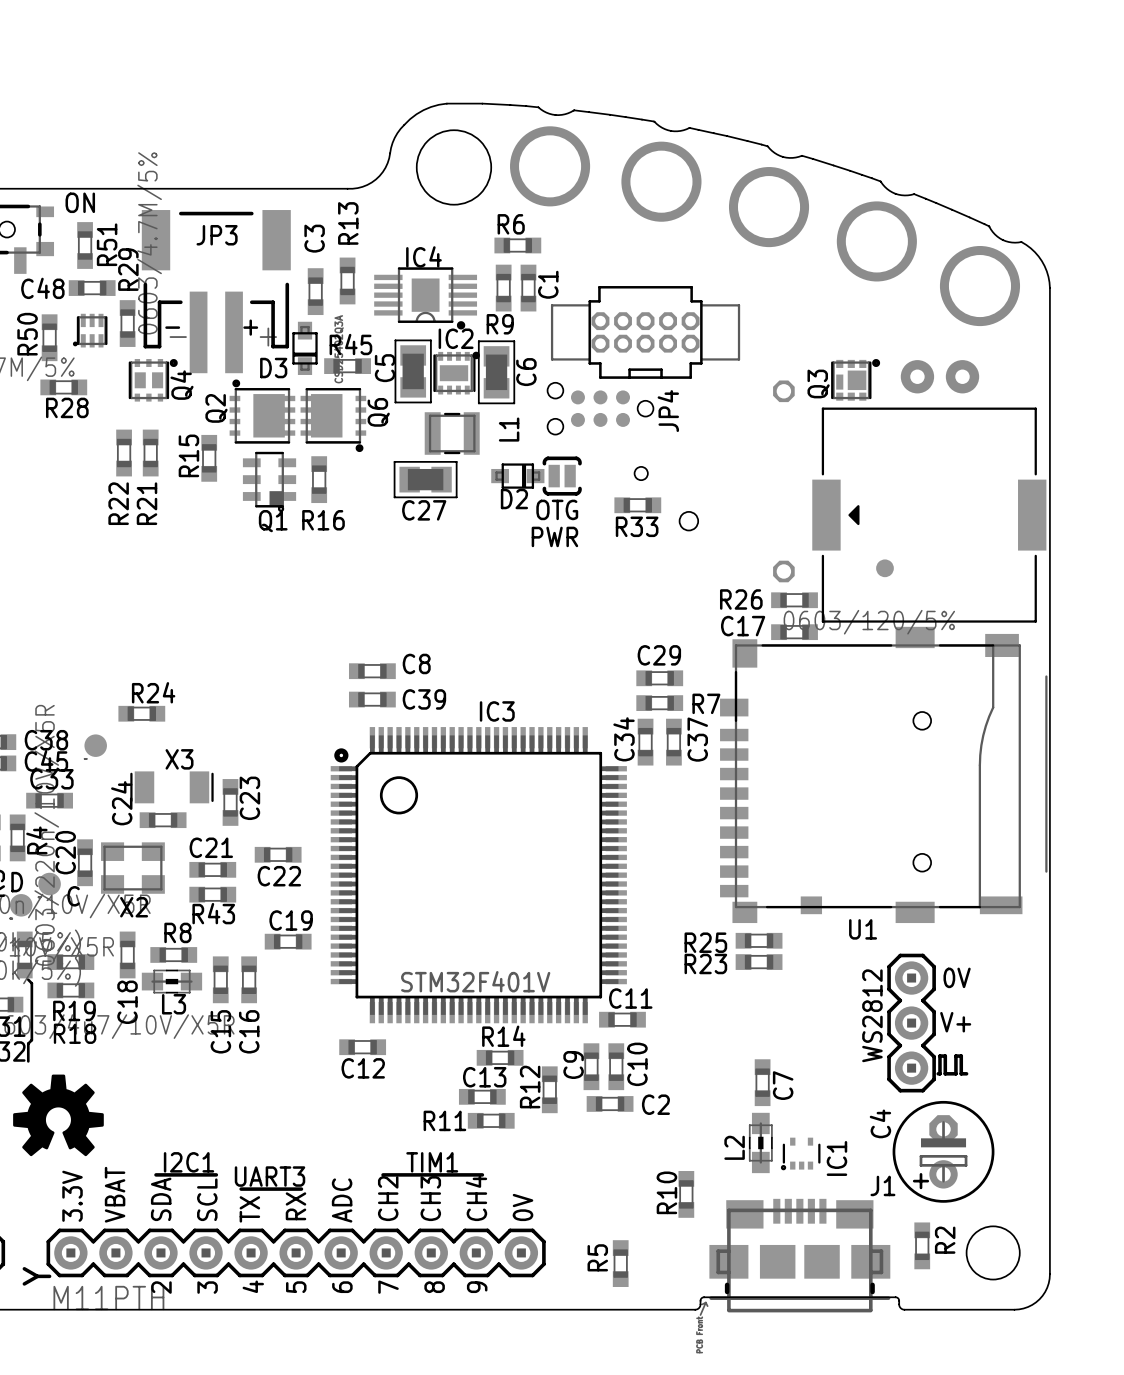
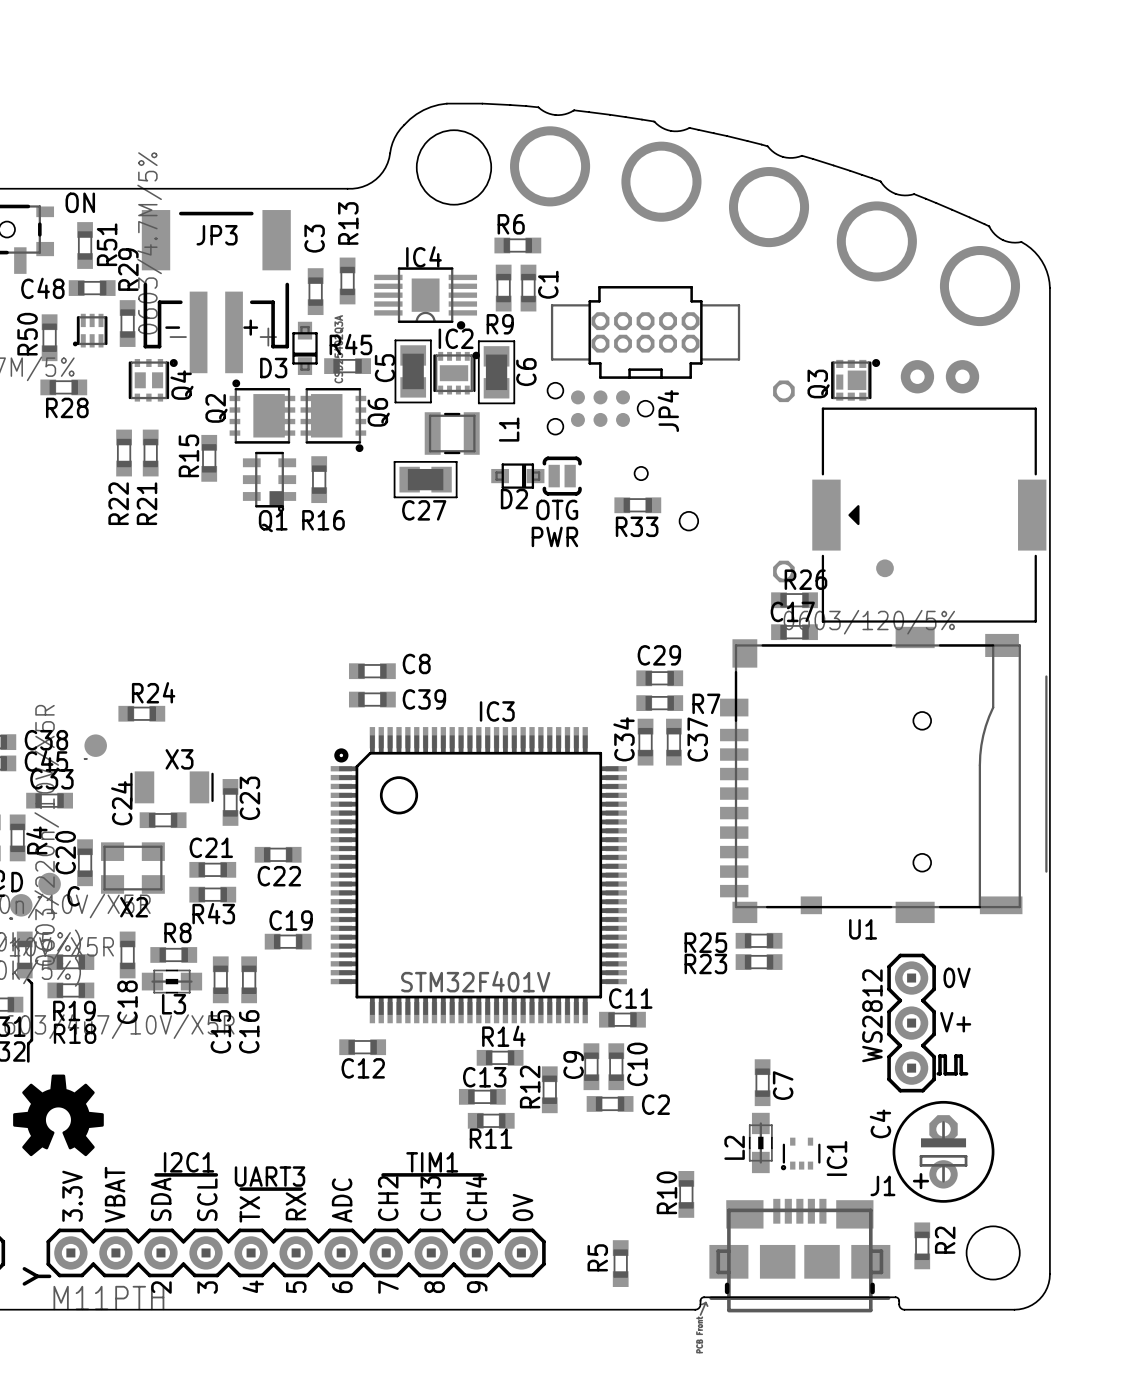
R26 name position: R26 (741, 599) -> R26 (805, 579)
C17 name position: C17 (743, 626) -> C17 (792, 611)
R11 name position: R11 (444, 1120) -> R11 (491, 1138)

